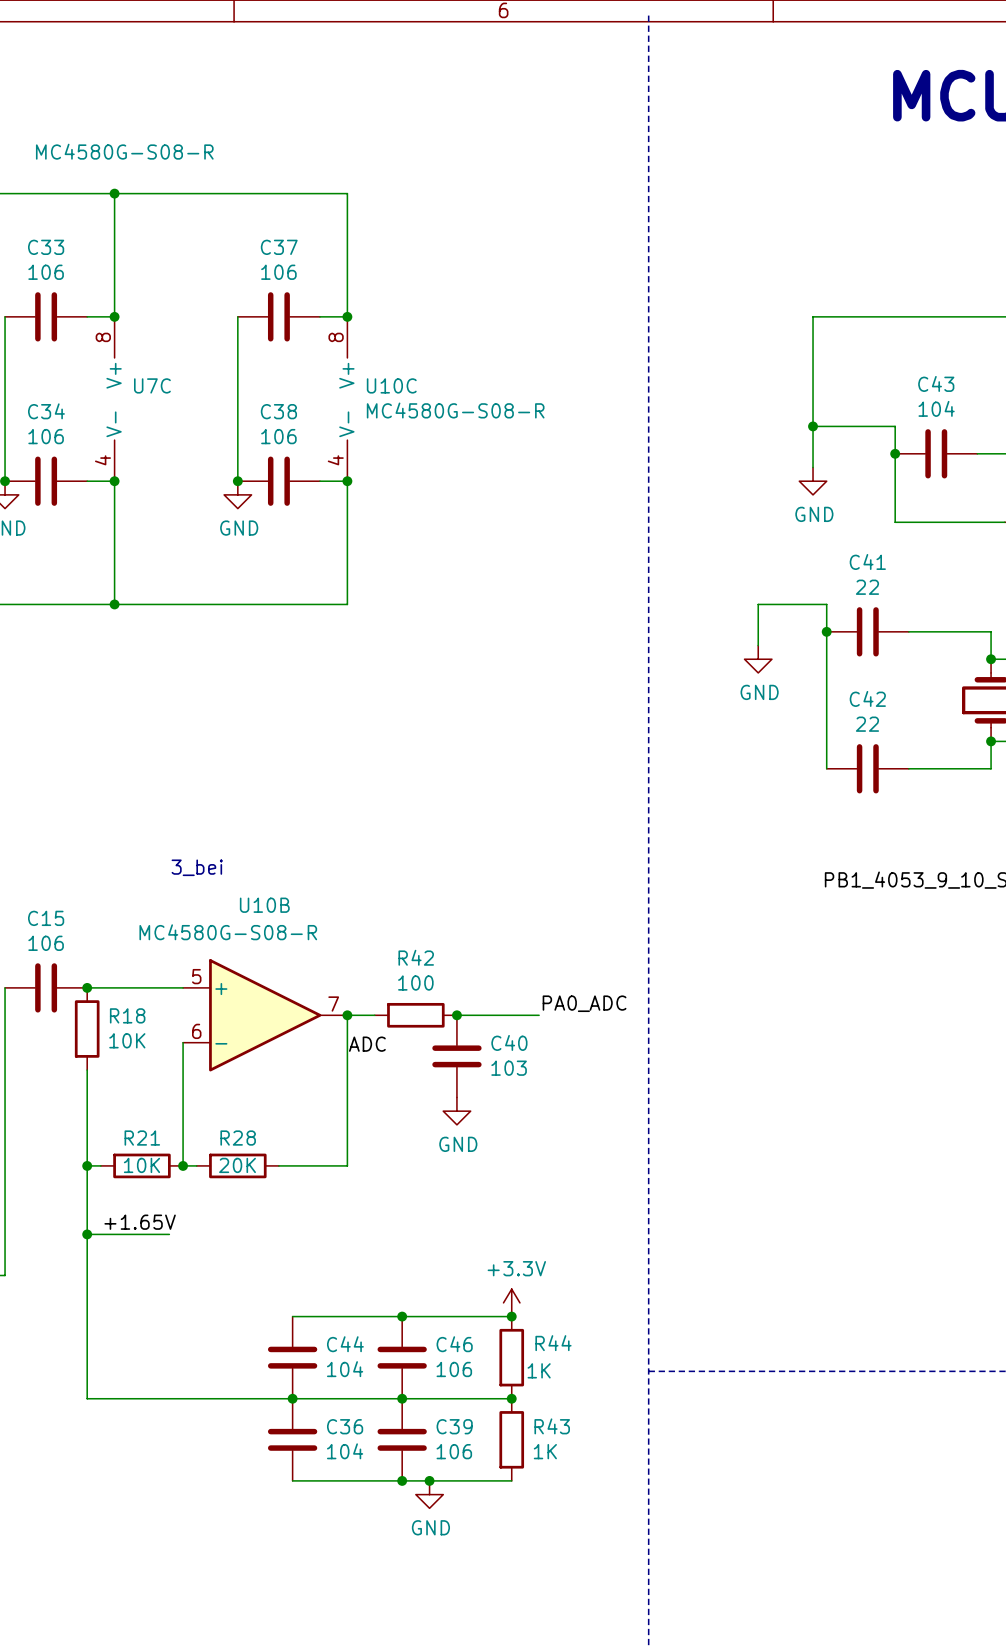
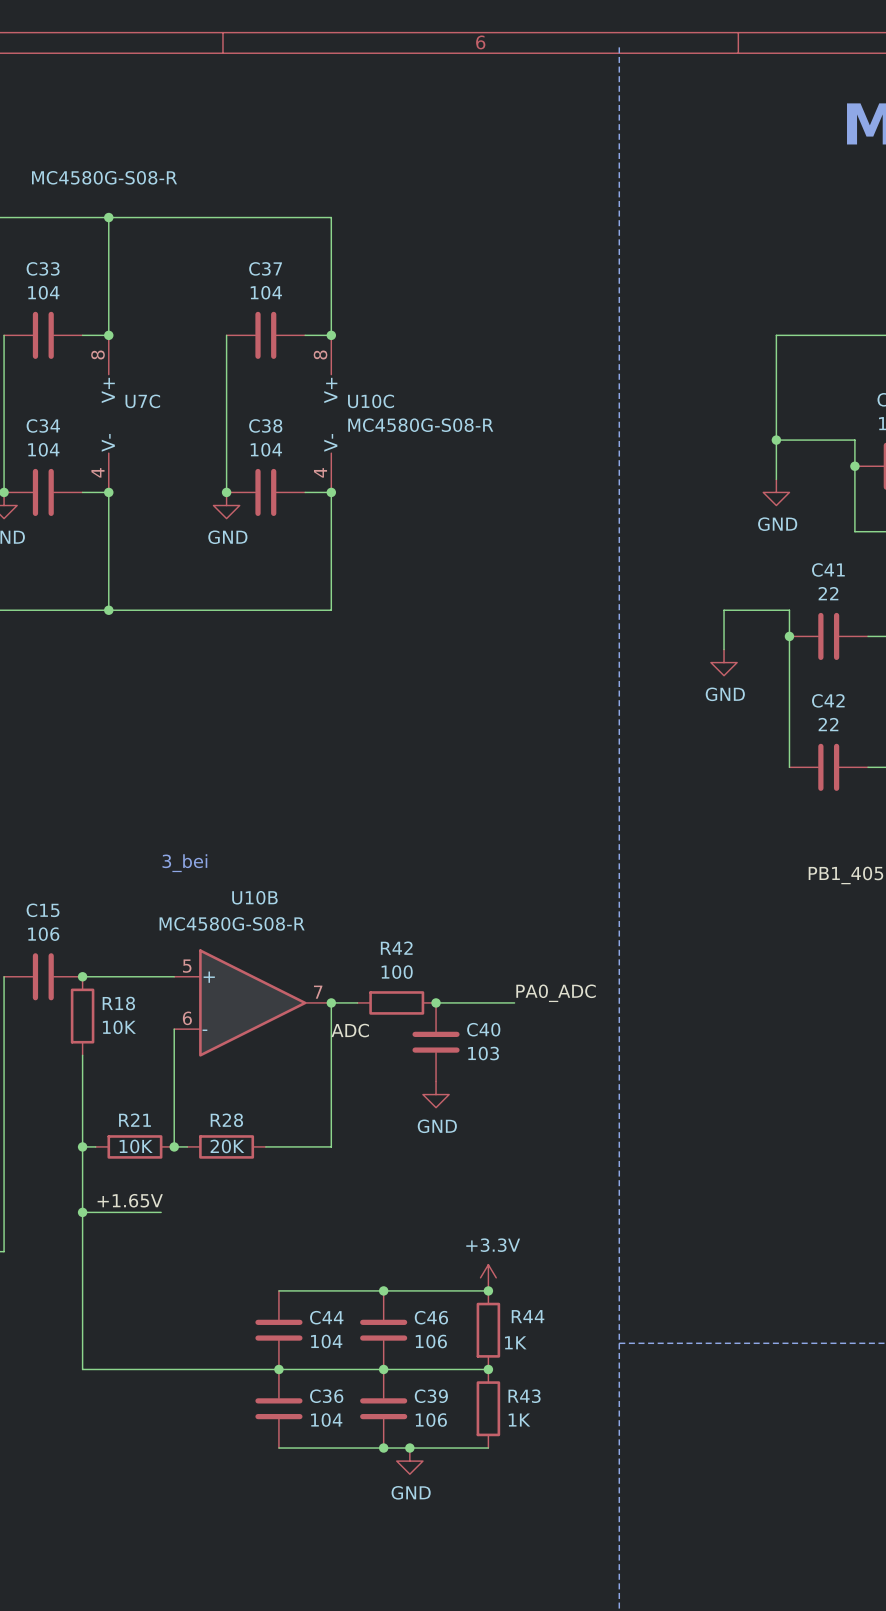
C33 value: 106 (46, 272) -> 104 (43, 292)
C37 value: 106 (278, 272) -> 104 (266, 292)
C34 value: 106 (46, 436) -> 104 (43, 449)
C38 value: 106 (278, 436) -> 104 (266, 449)

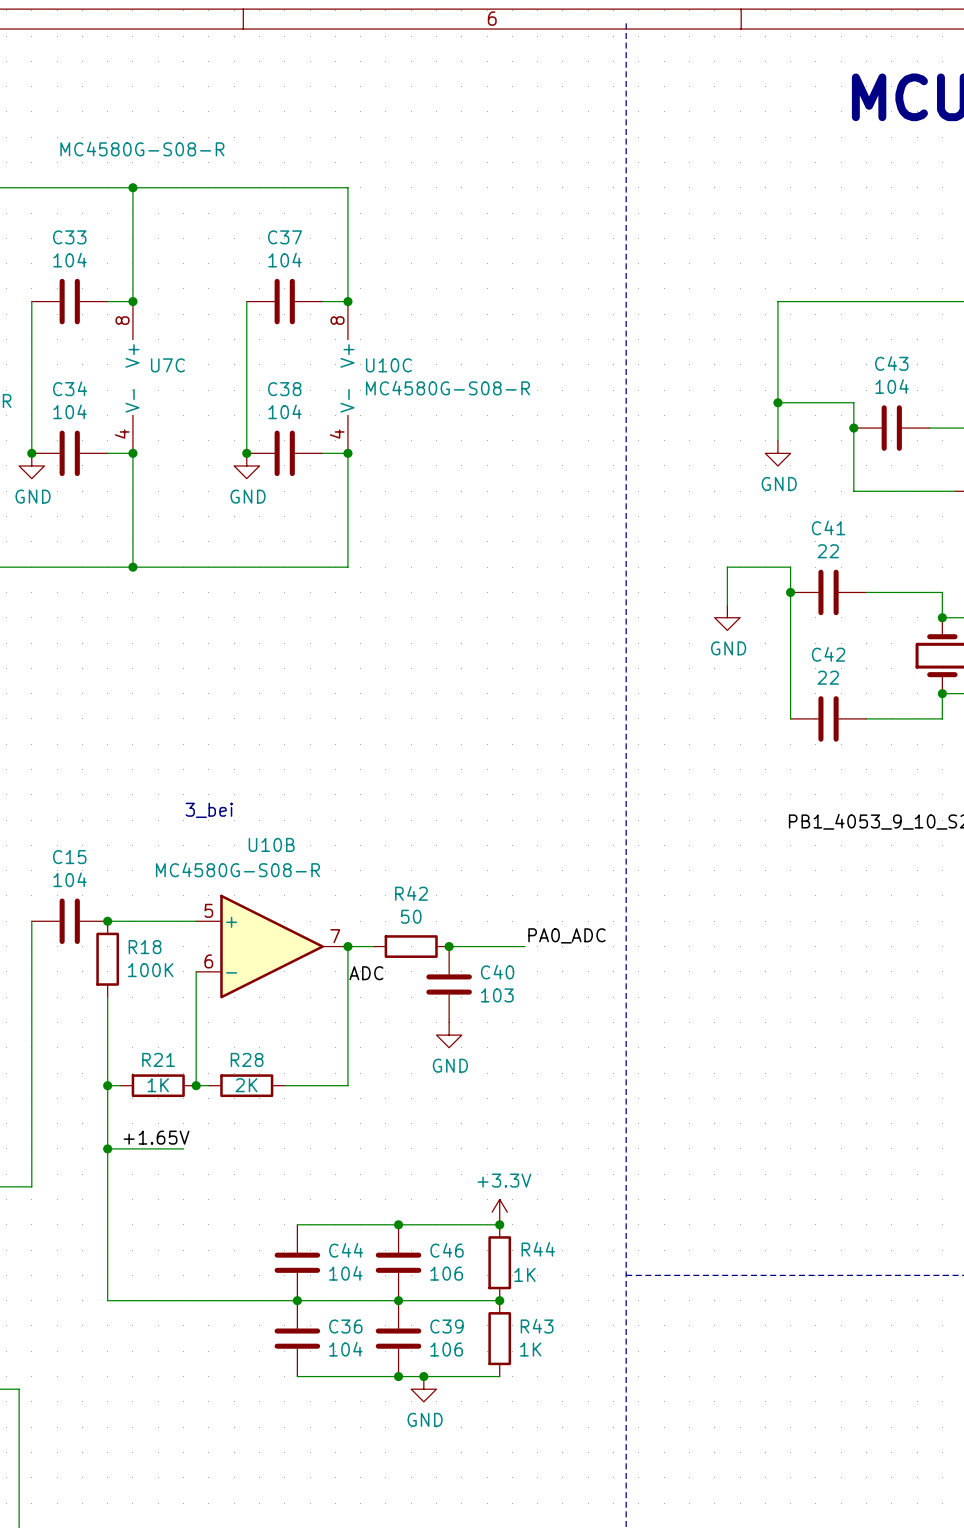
C15 value: 106 (43, 934) -> 104 (70, 879)
R42 value: 100 (397, 972) -> 50 (411, 916)
R18 value: 10K (119, 1027) -> 100K (150, 970)
R21 value: 10K (136, 1146) -> 1K (158, 1085)
R28 value: 20K (227, 1146) -> 2K (246, 1085)

